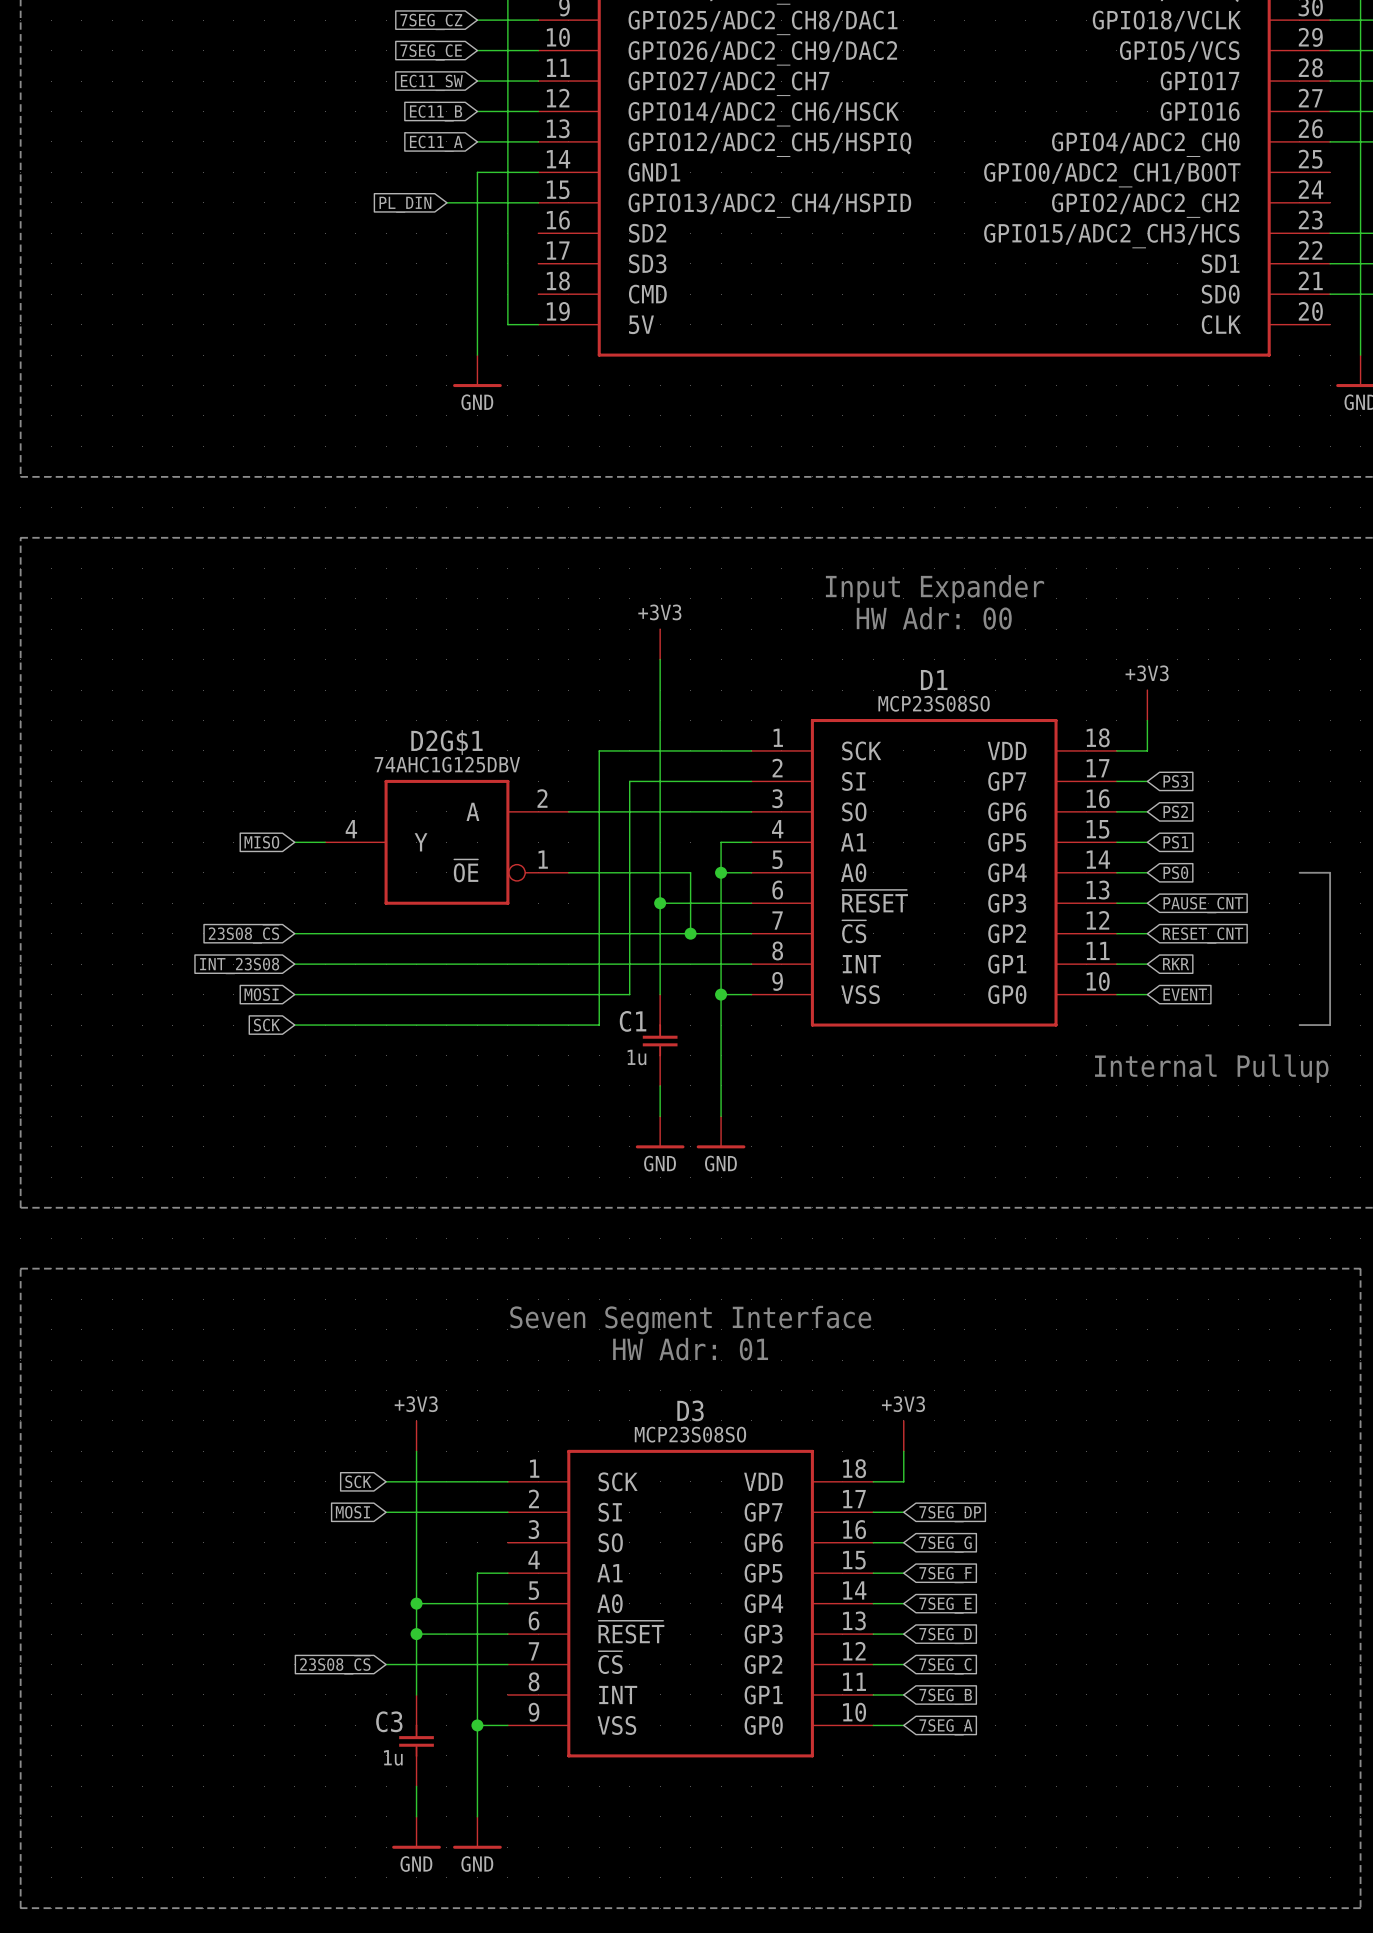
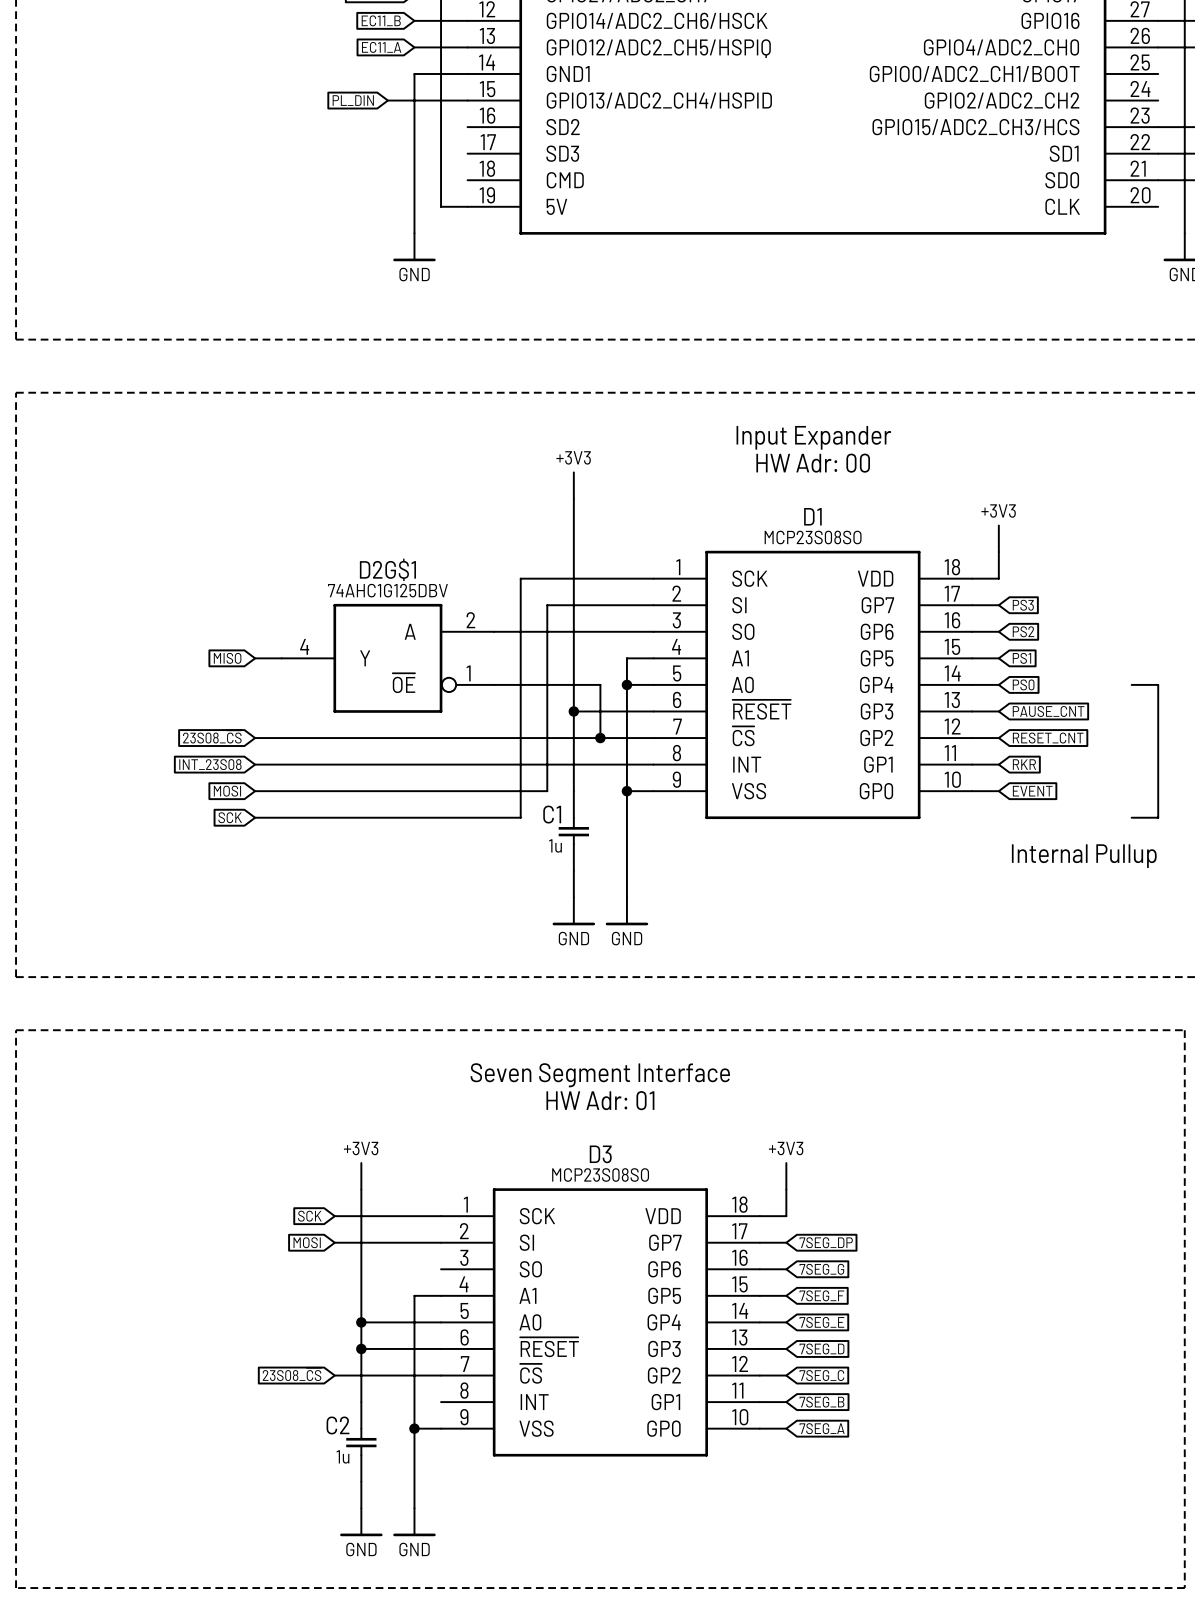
C3 name: C3 (389, 1721) -> C2 (338, 1425)

